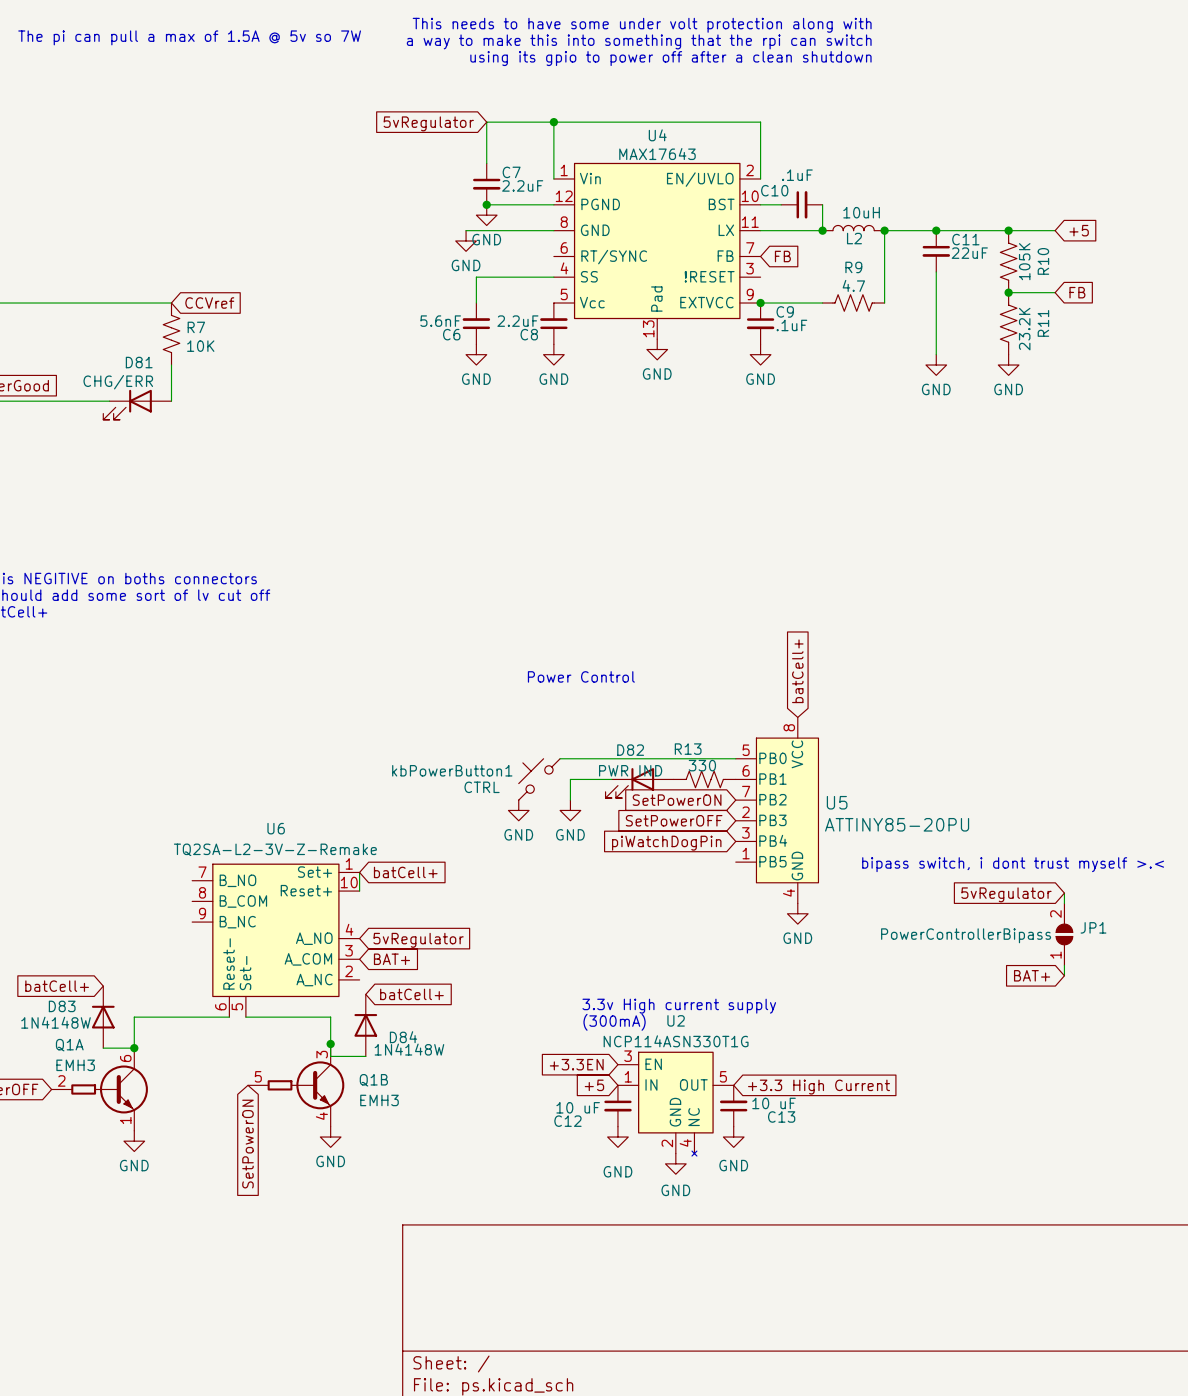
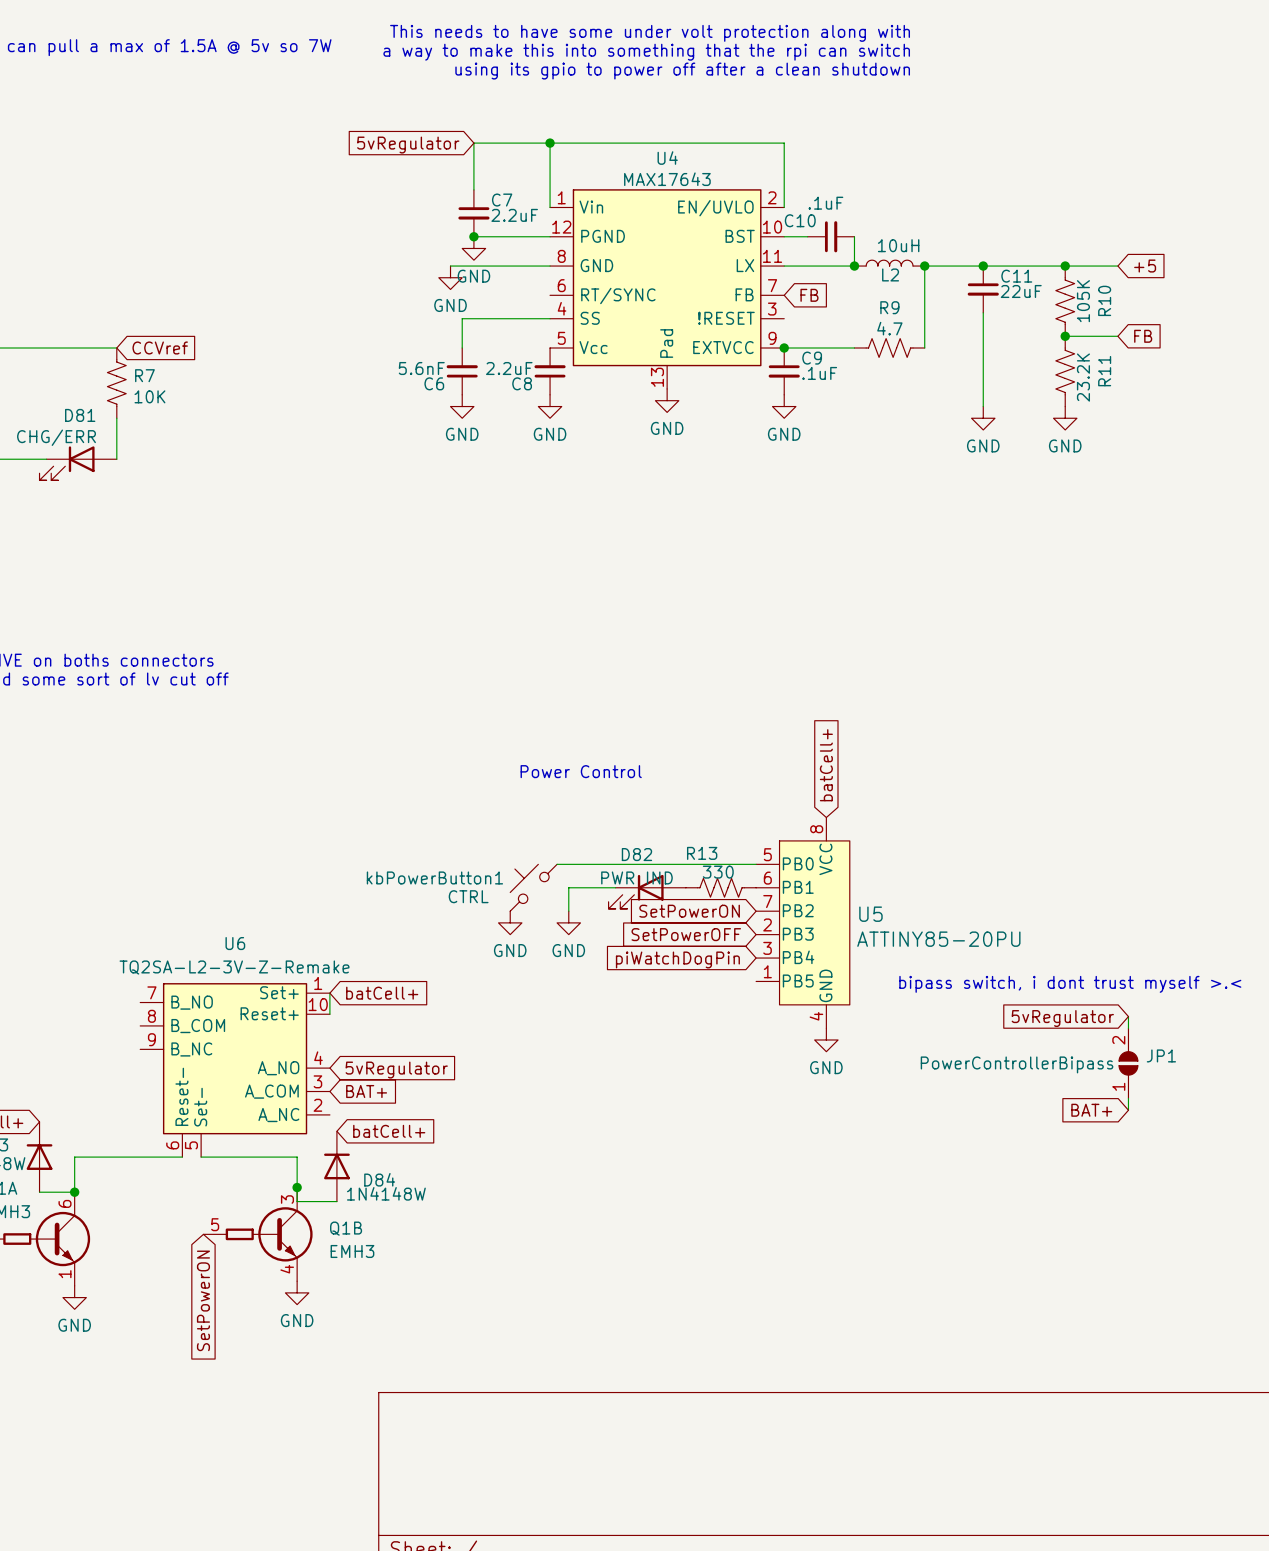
text: 3.3v High current supply (679, 1006) -> none
text: (300mA) (614, 1022) -> none
global label: +3.3EN (576, 1064) -> none
global label: +5 (594, 1085) -> none
global label: +3.3 High Current (818, 1087) -> none
U2: NCP114ASN330T1G (675, 1103) -> none
C12: 10 uF (617, 1106) -> none
C13: 10 uF (733, 1106) -> none
power symbol: GND (617, 1137) -> none
power symbol: GND (733, 1137) -> none
power symbol: GND (675, 1163) -> none

